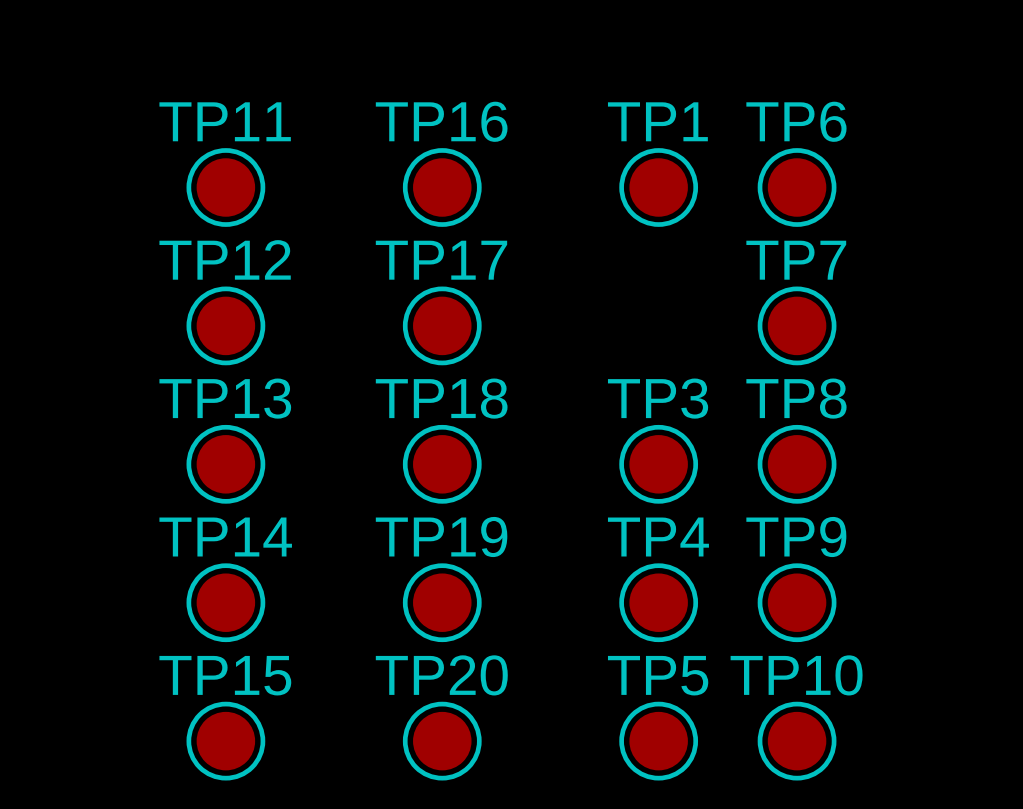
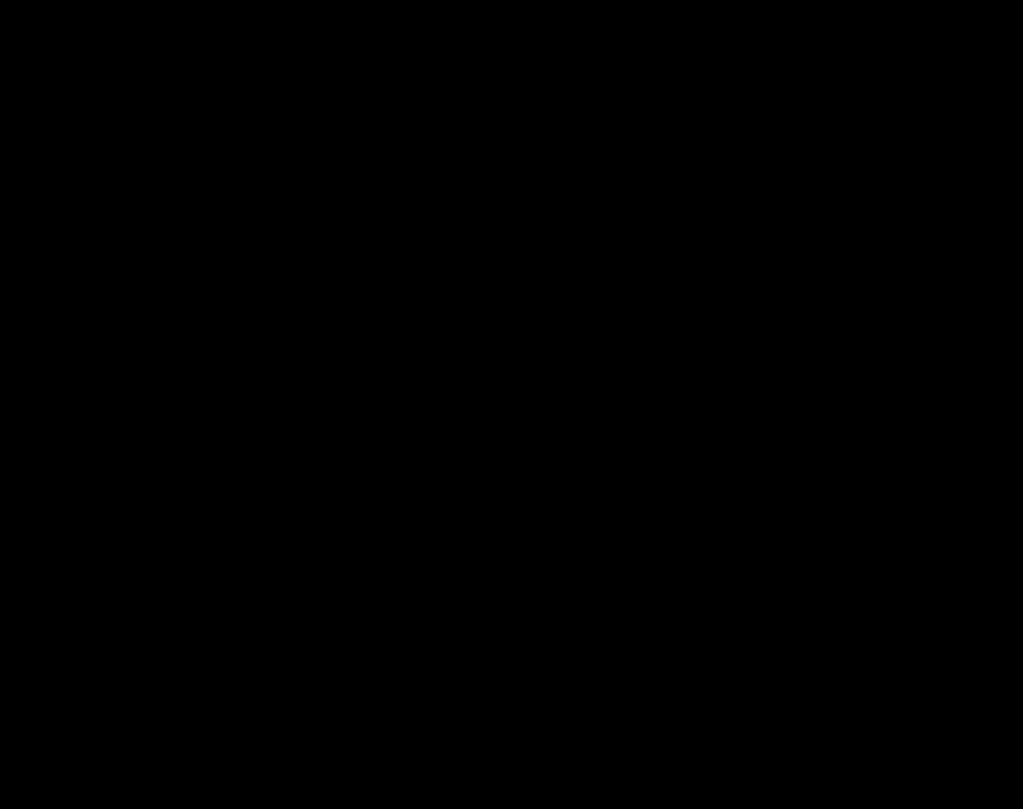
TP11: (225, 187) -> none
TP16: (442, 187) -> none
TP1: (658, 187) -> none
TP6: (797, 187) -> none
TP12: (225, 325) -> none
TP17: (442, 325) -> none
TP7: (797, 325) -> none
TP13: (225, 464) -> none
TP18: (442, 464) -> none
TP3: (658, 464) -> none
TP8: (797, 464) -> none
TP14: (225, 602) -> none
TP19: (442, 602) -> none
TP4: (658, 602) -> none
TP9: (797, 602) -> none
TP15: (225, 741) -> none
TP20: (442, 741) -> none
TP5: (658, 741) -> none
TP10: (797, 741) -> none

